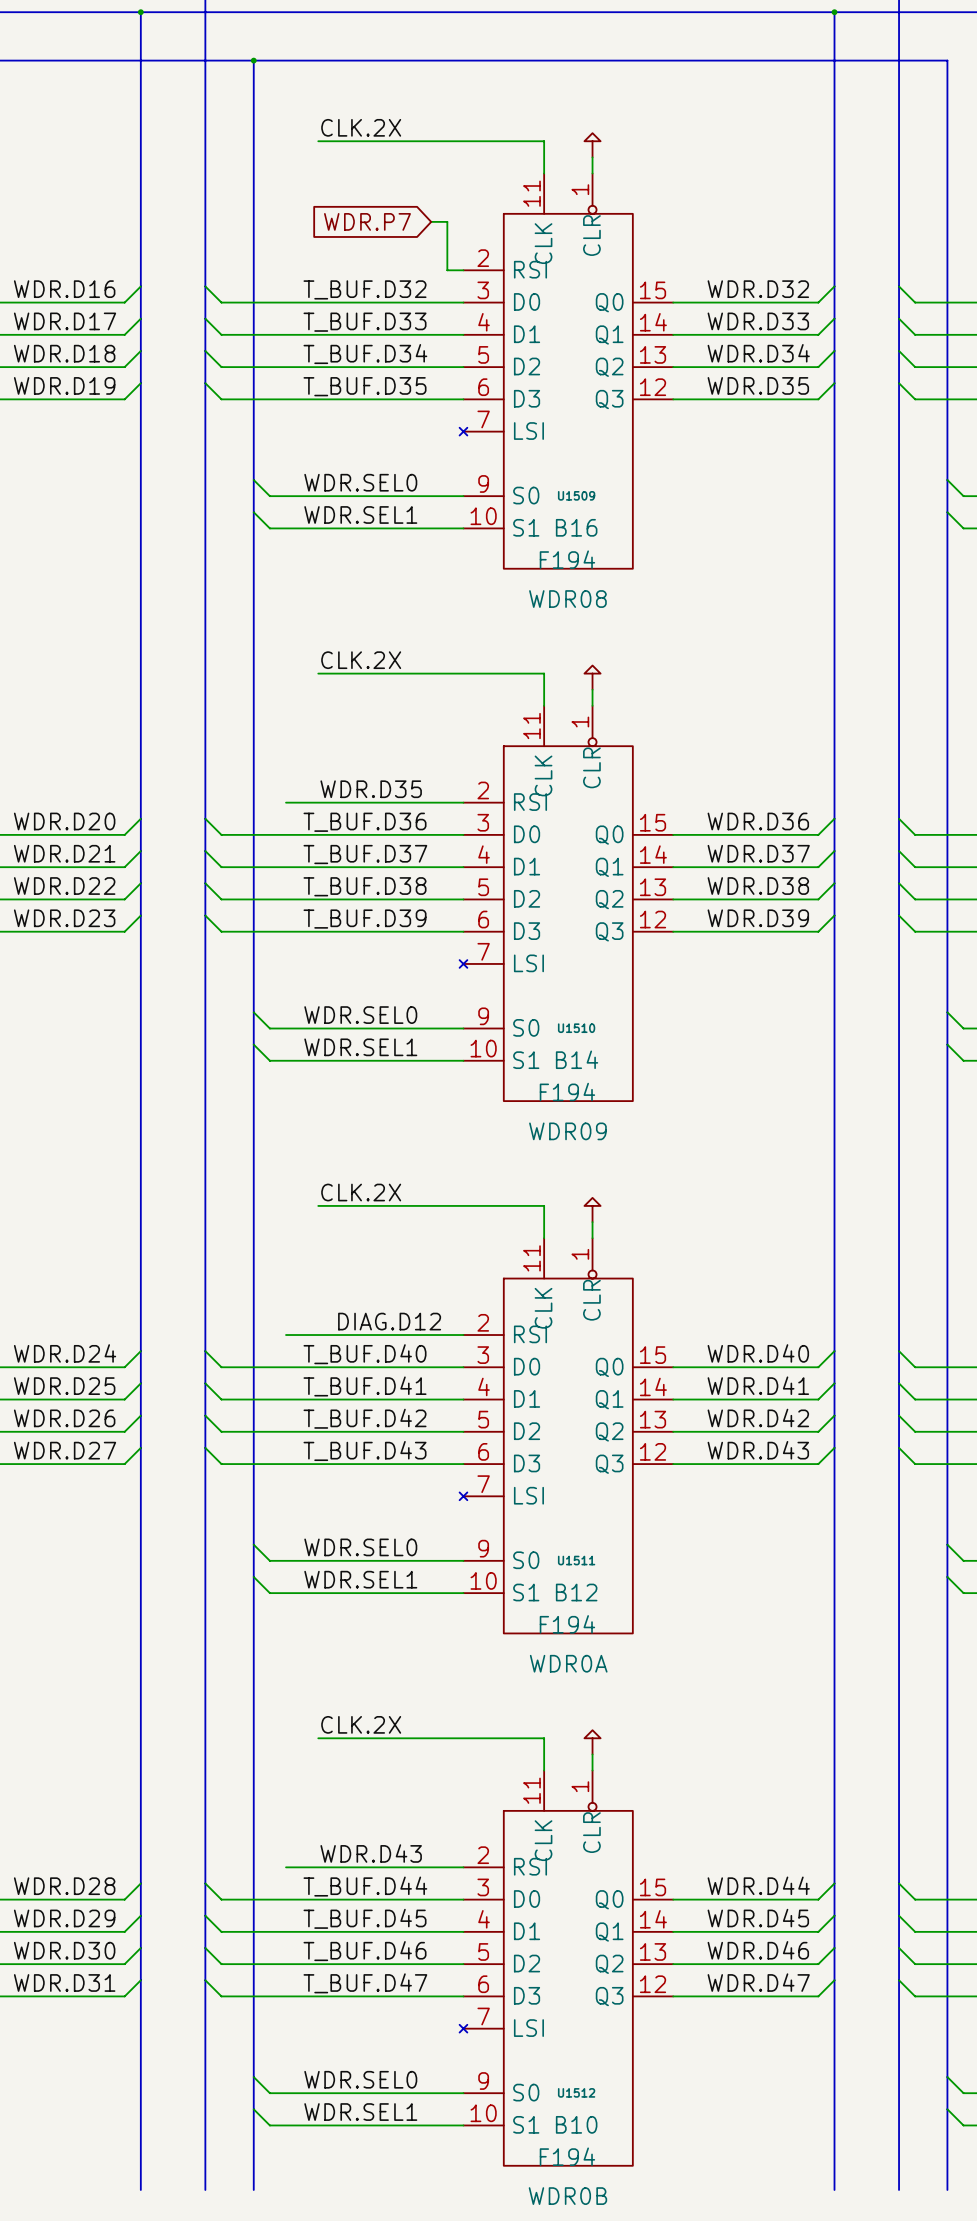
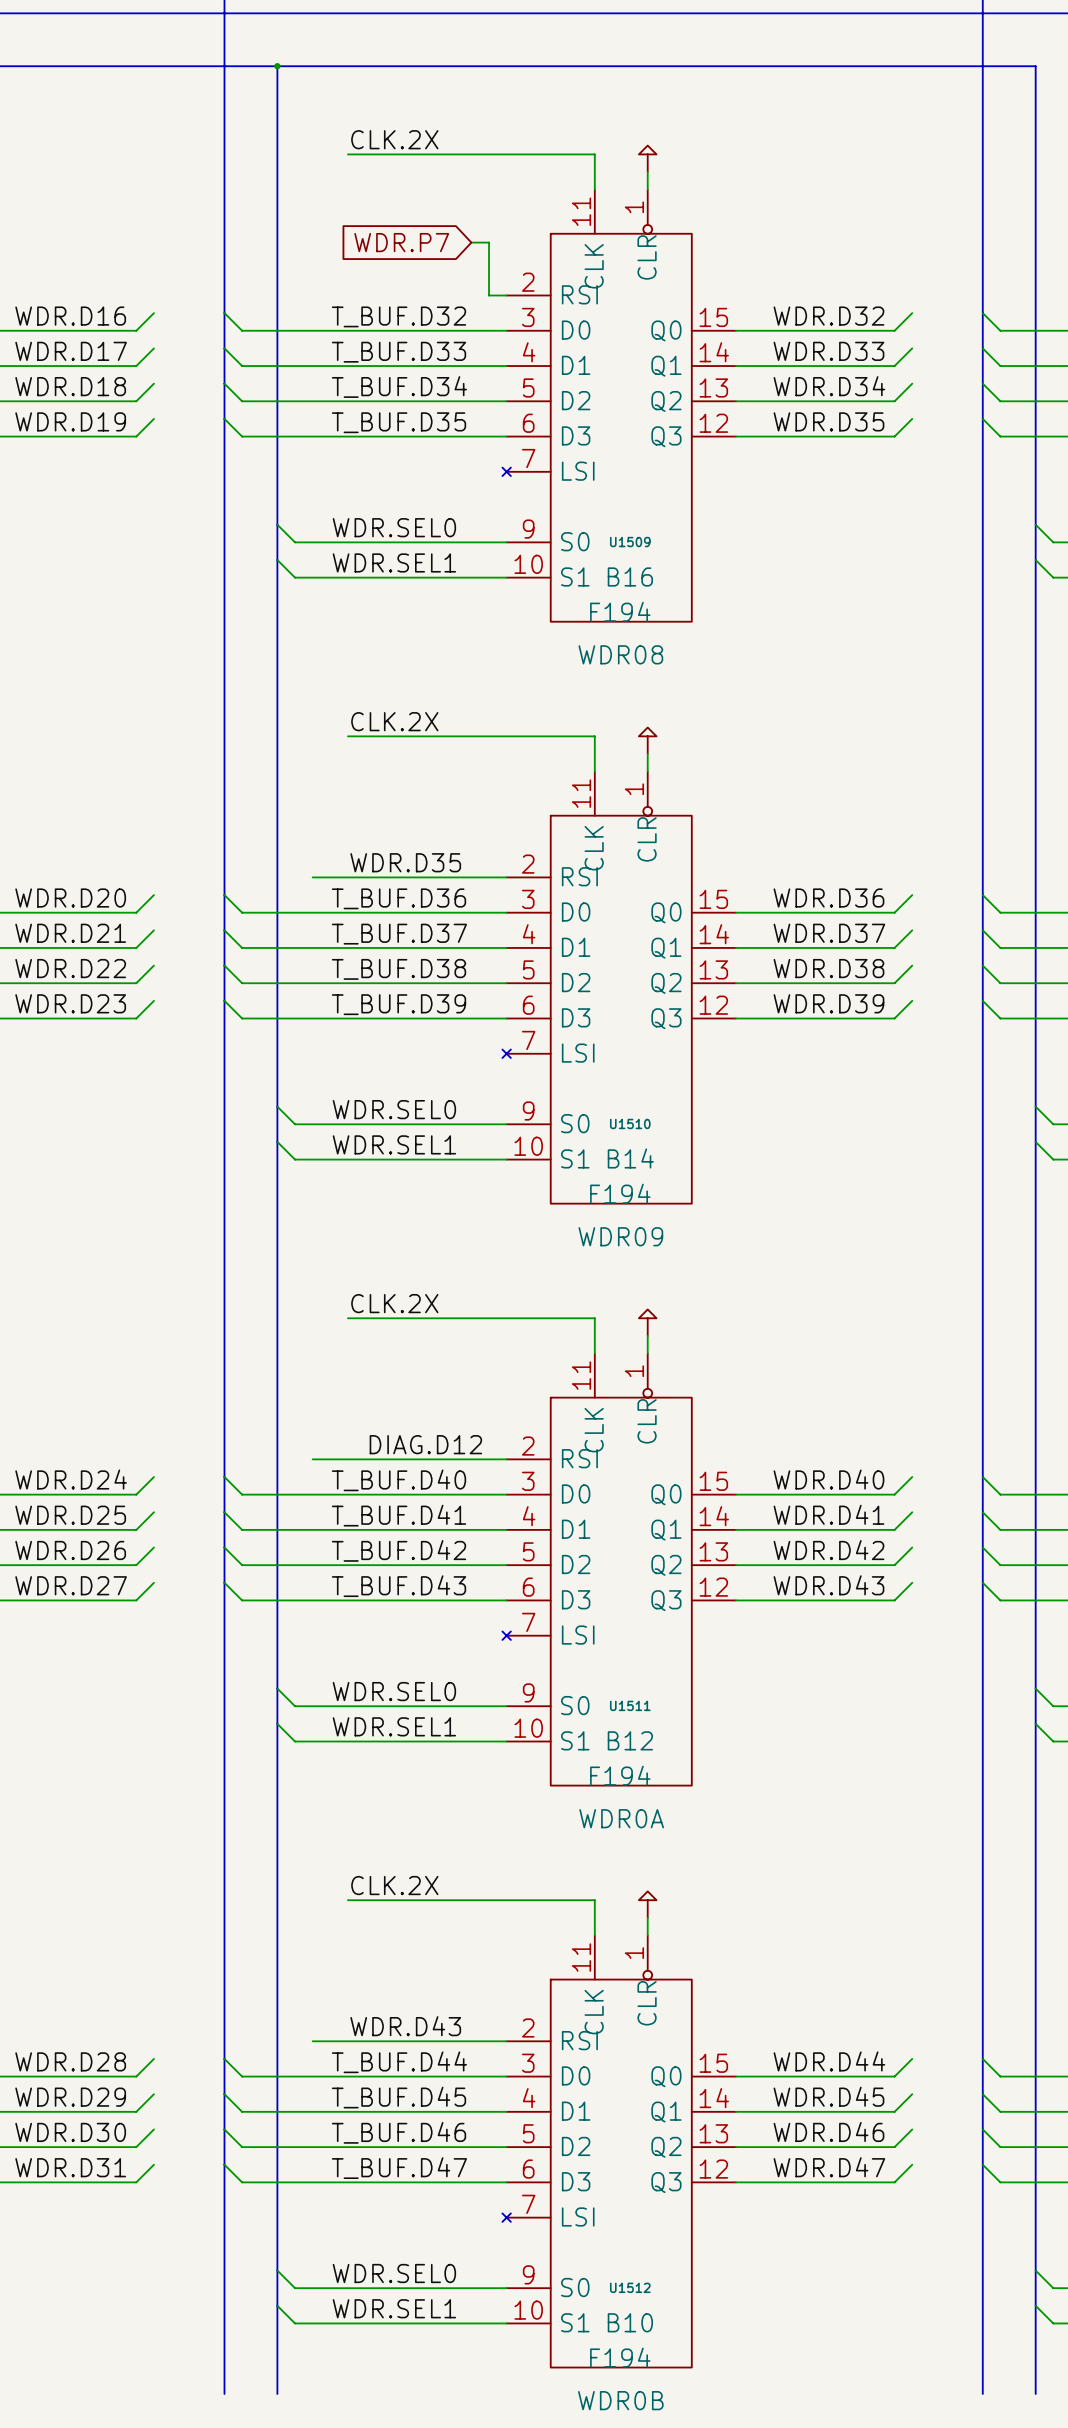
bus: (140, 12) (140, 2189) -> none
junction: (140, 12) -> none
bus: (834, 12) (834, 2189) -> none
junction: (834, 12) -> none

